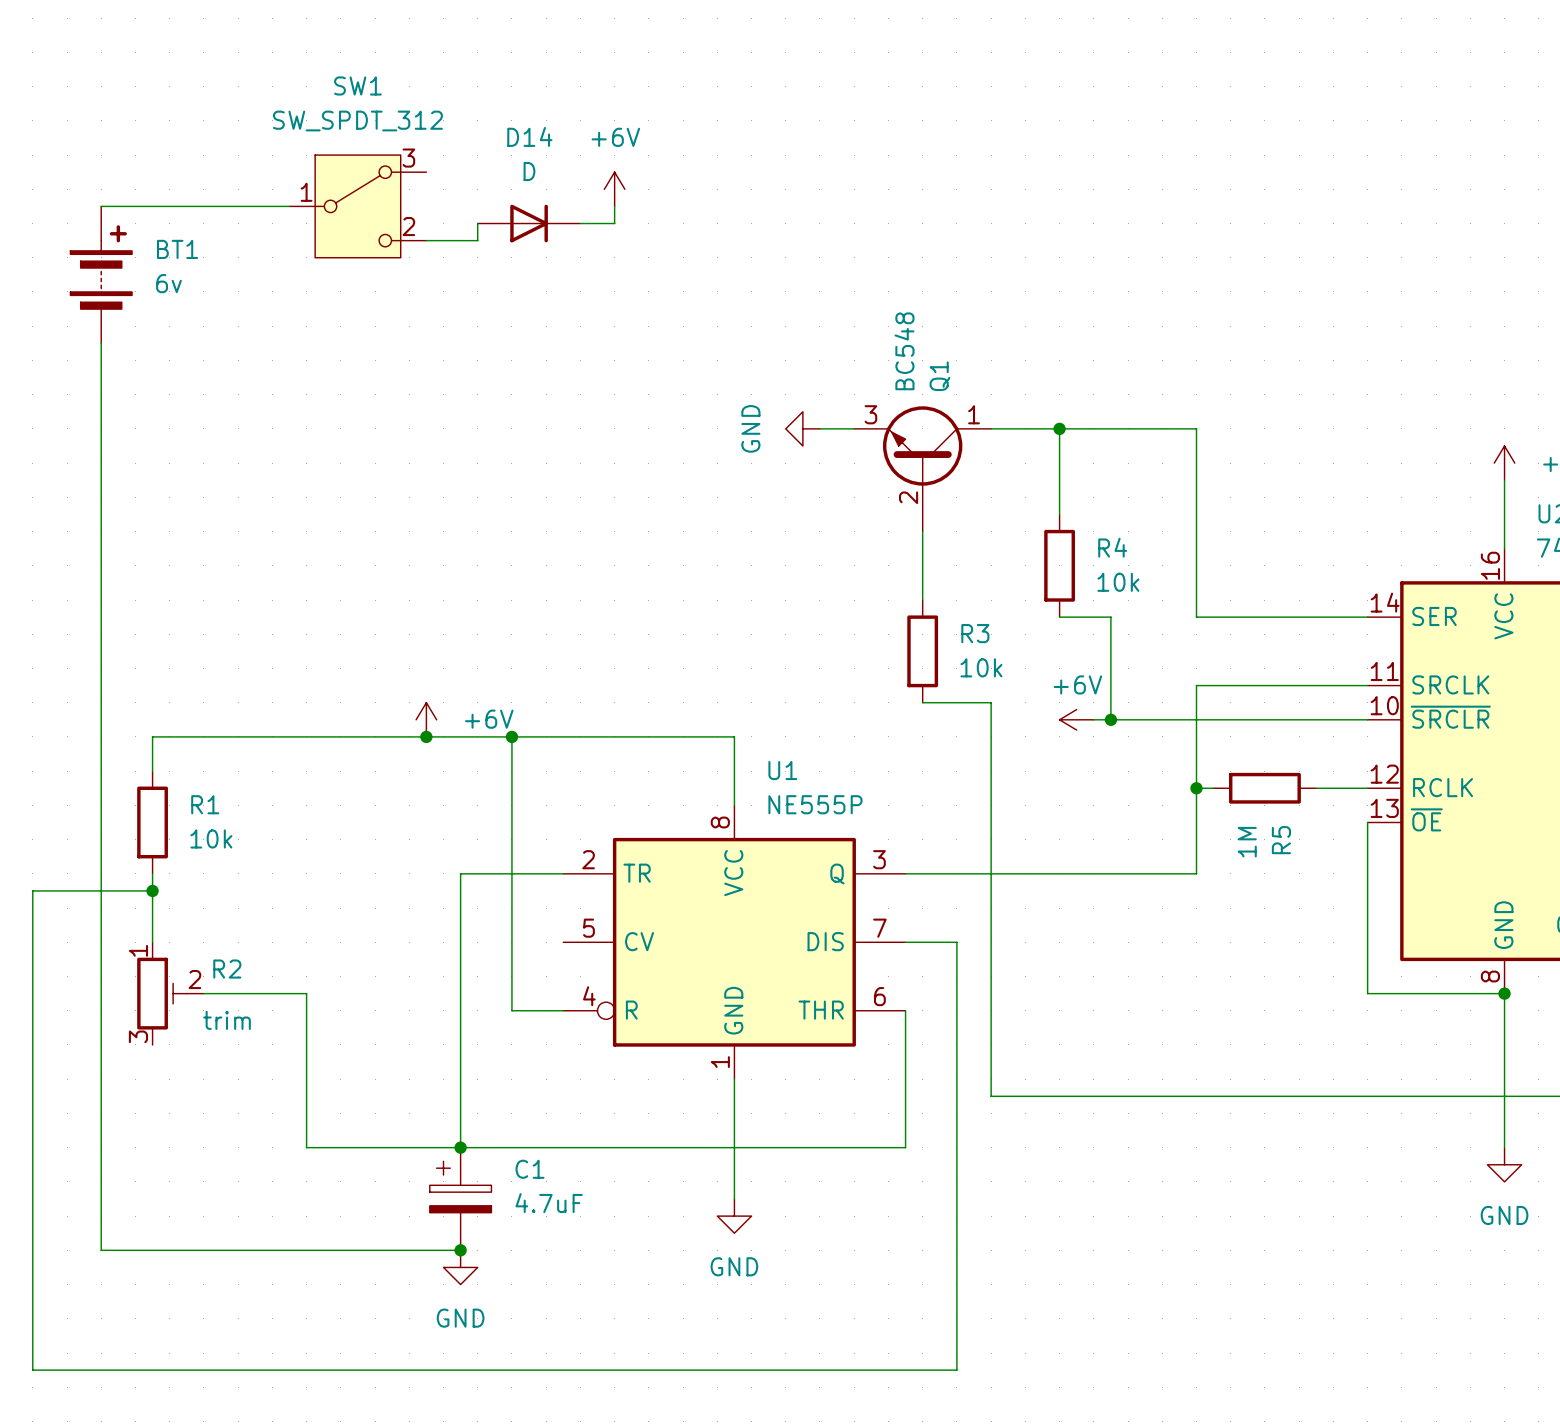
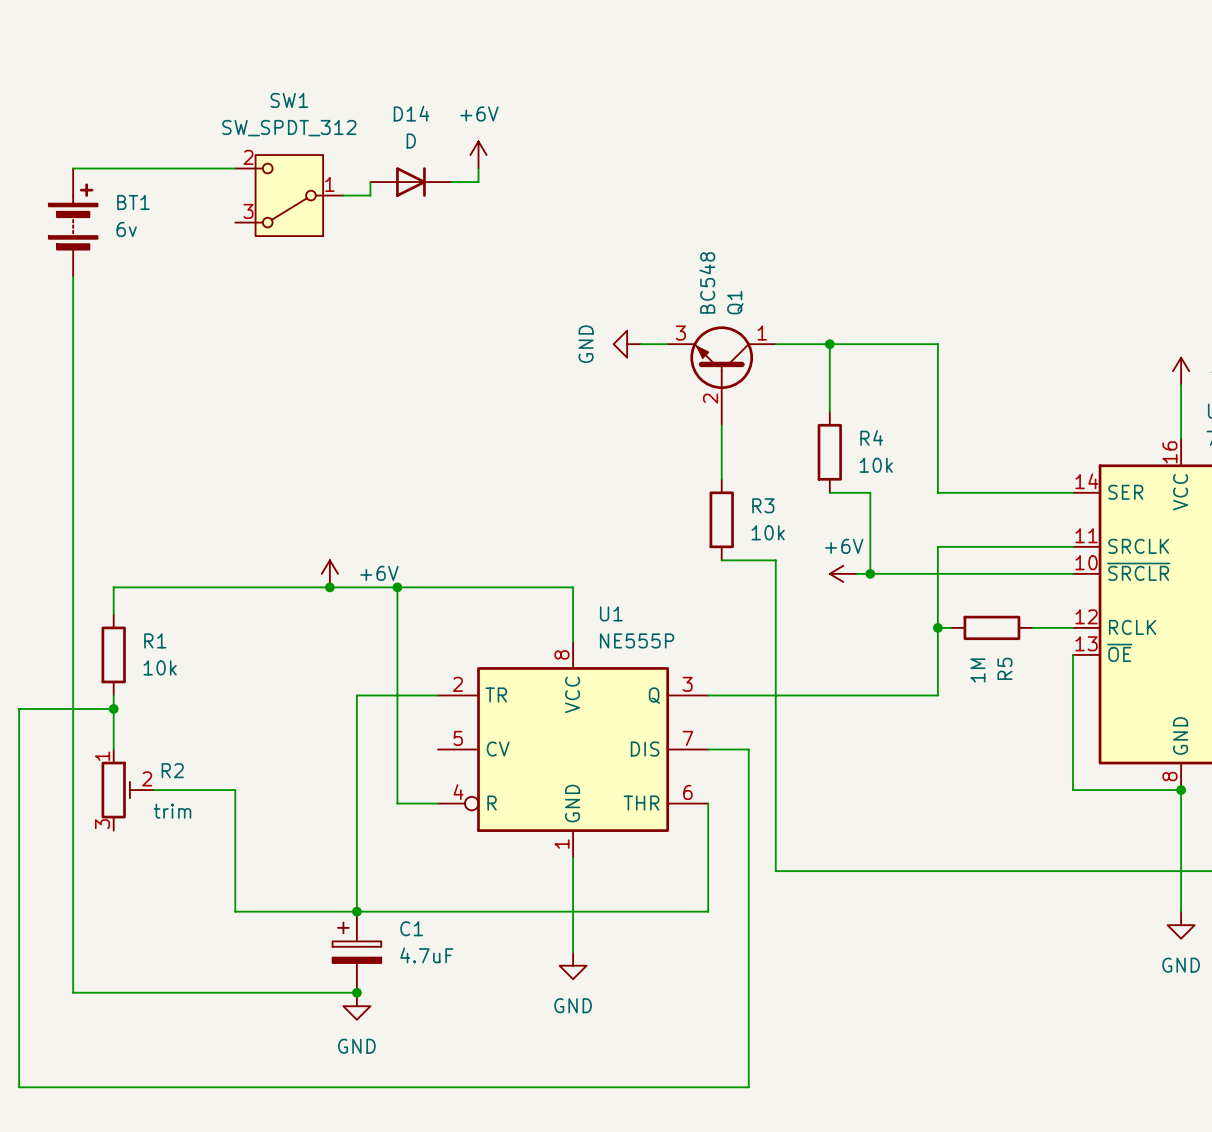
SW1 rotation: 0° (357, 206) -> 180° (289, 195)

